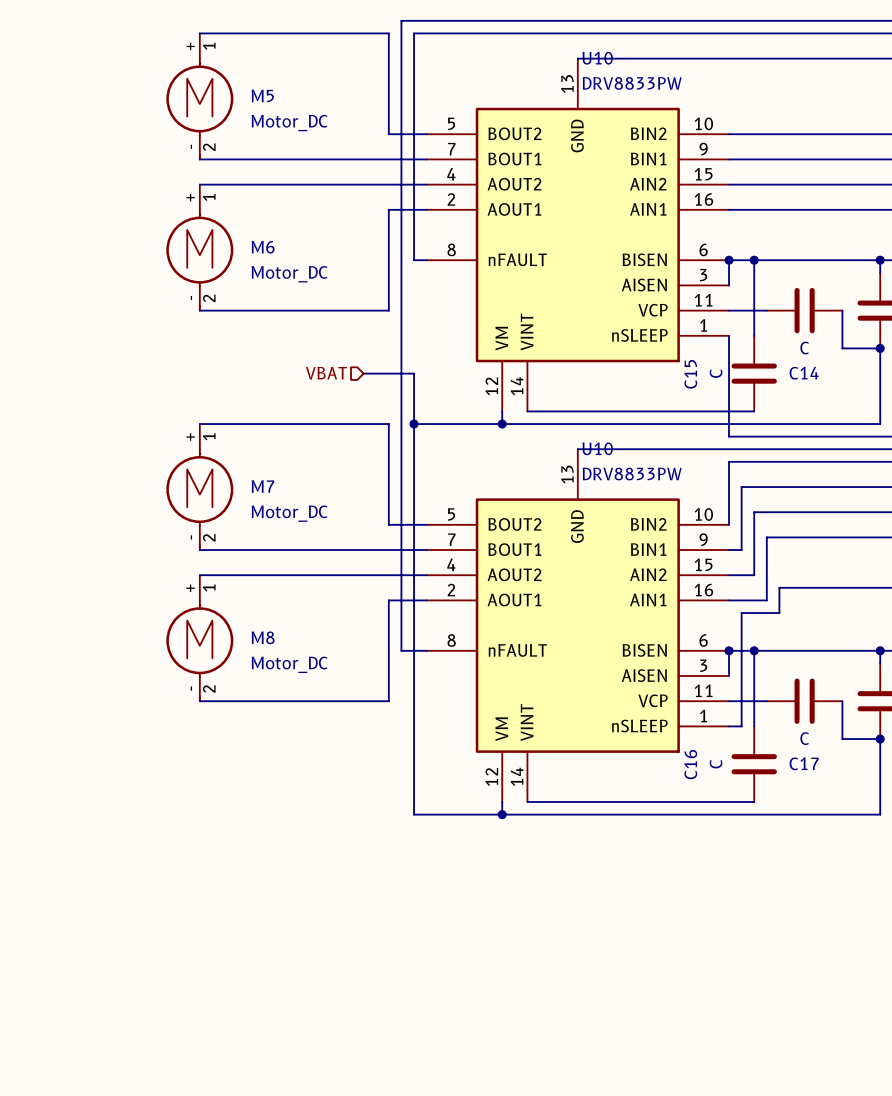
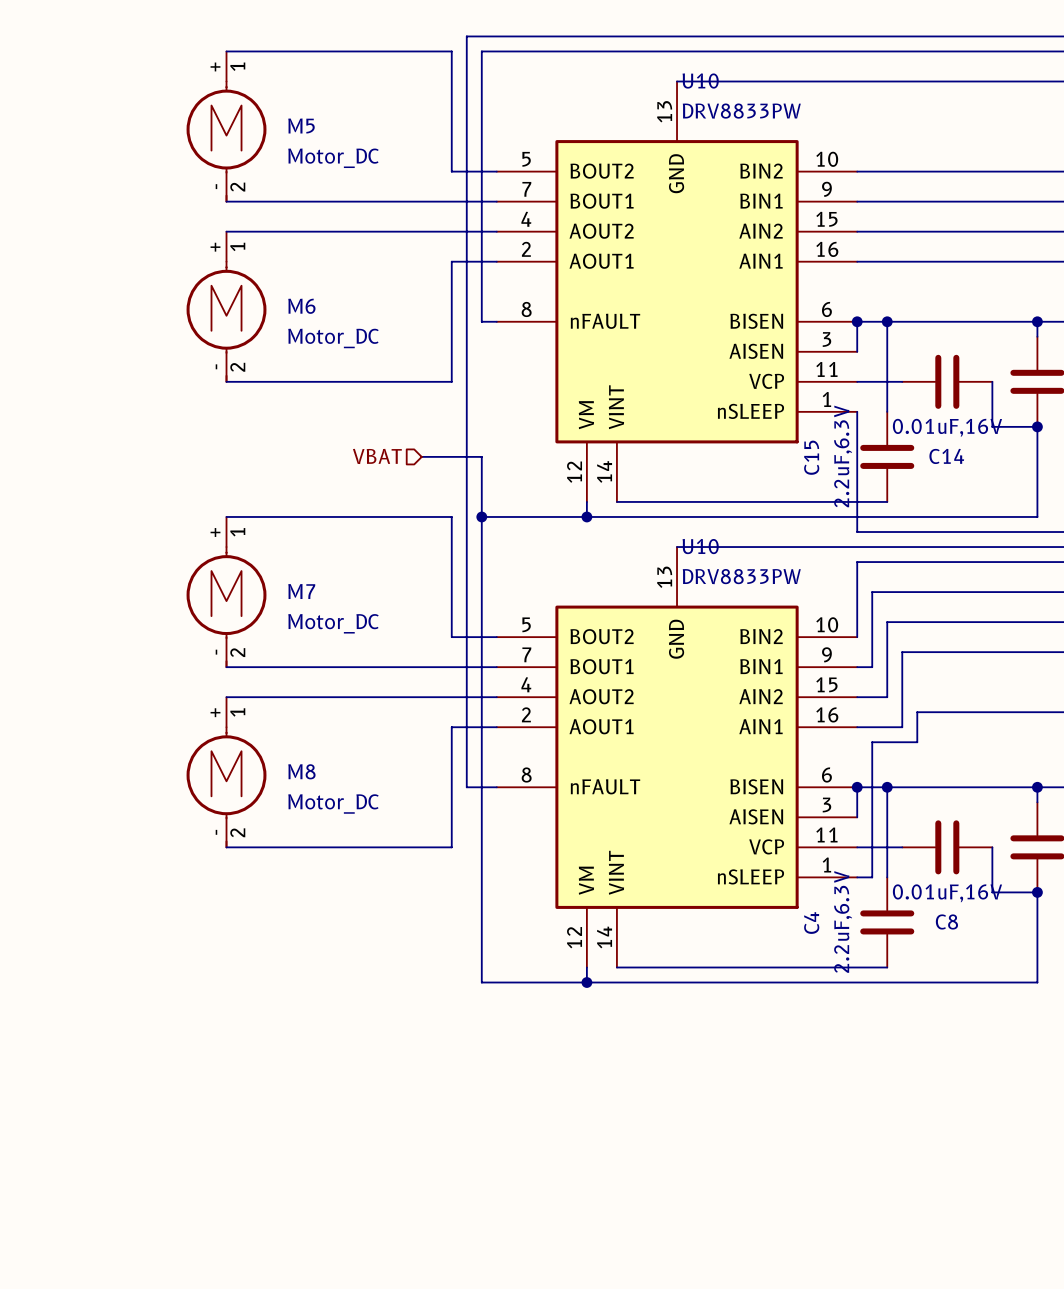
C14 value: C (804, 348) -> 0.01uF,16V (947, 427)
C15 value: C (716, 373) -> 2.2uF,6.3V (843, 456)
C17 value: C (804, 738) -> 0.01uF,16V (947, 893)
C17 name: C17 (804, 763) -> C8 (946, 921)
C16 name: C16 (690, 764) -> C4 (811, 922)
C16 value: C (716, 764) -> 2.2uF,6.3V (843, 921)

